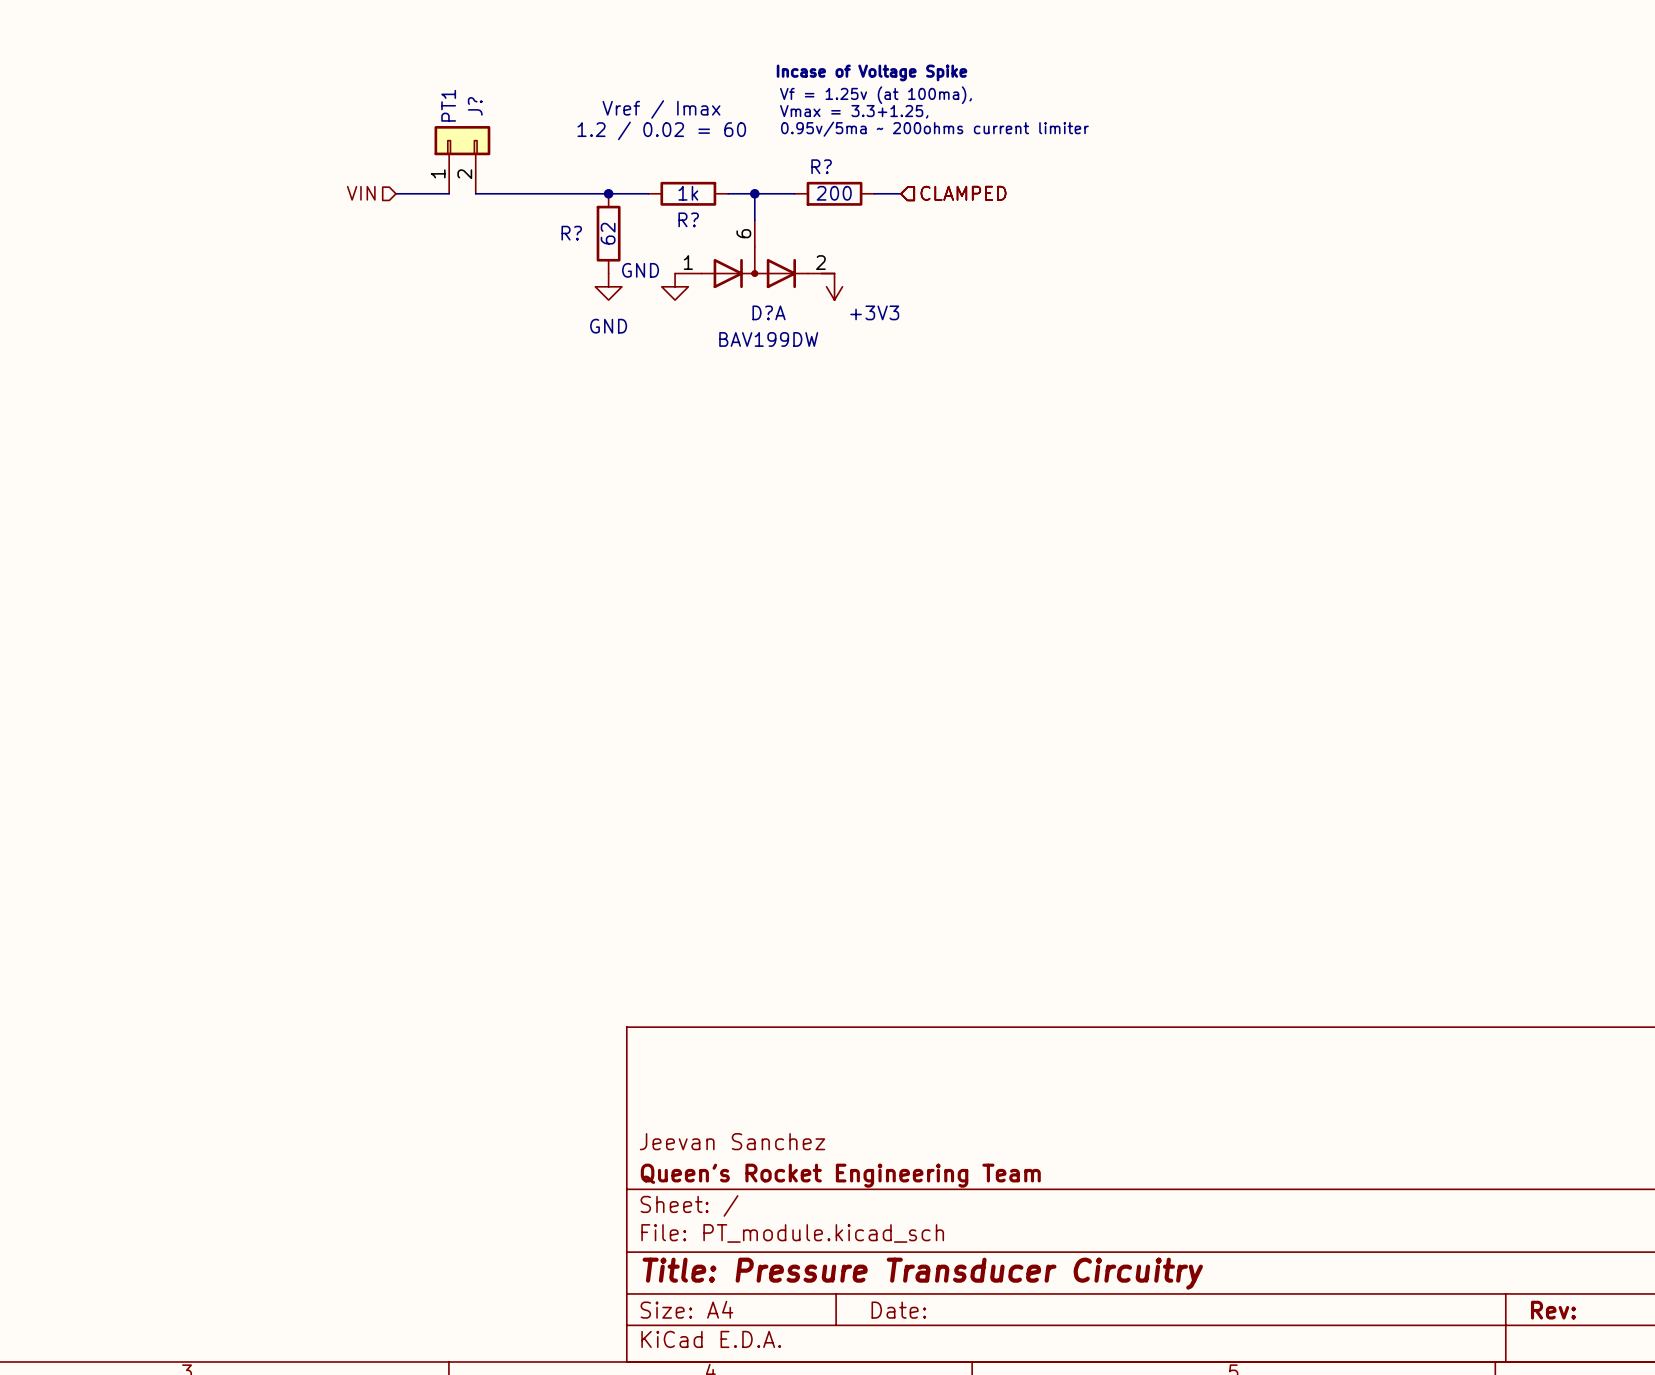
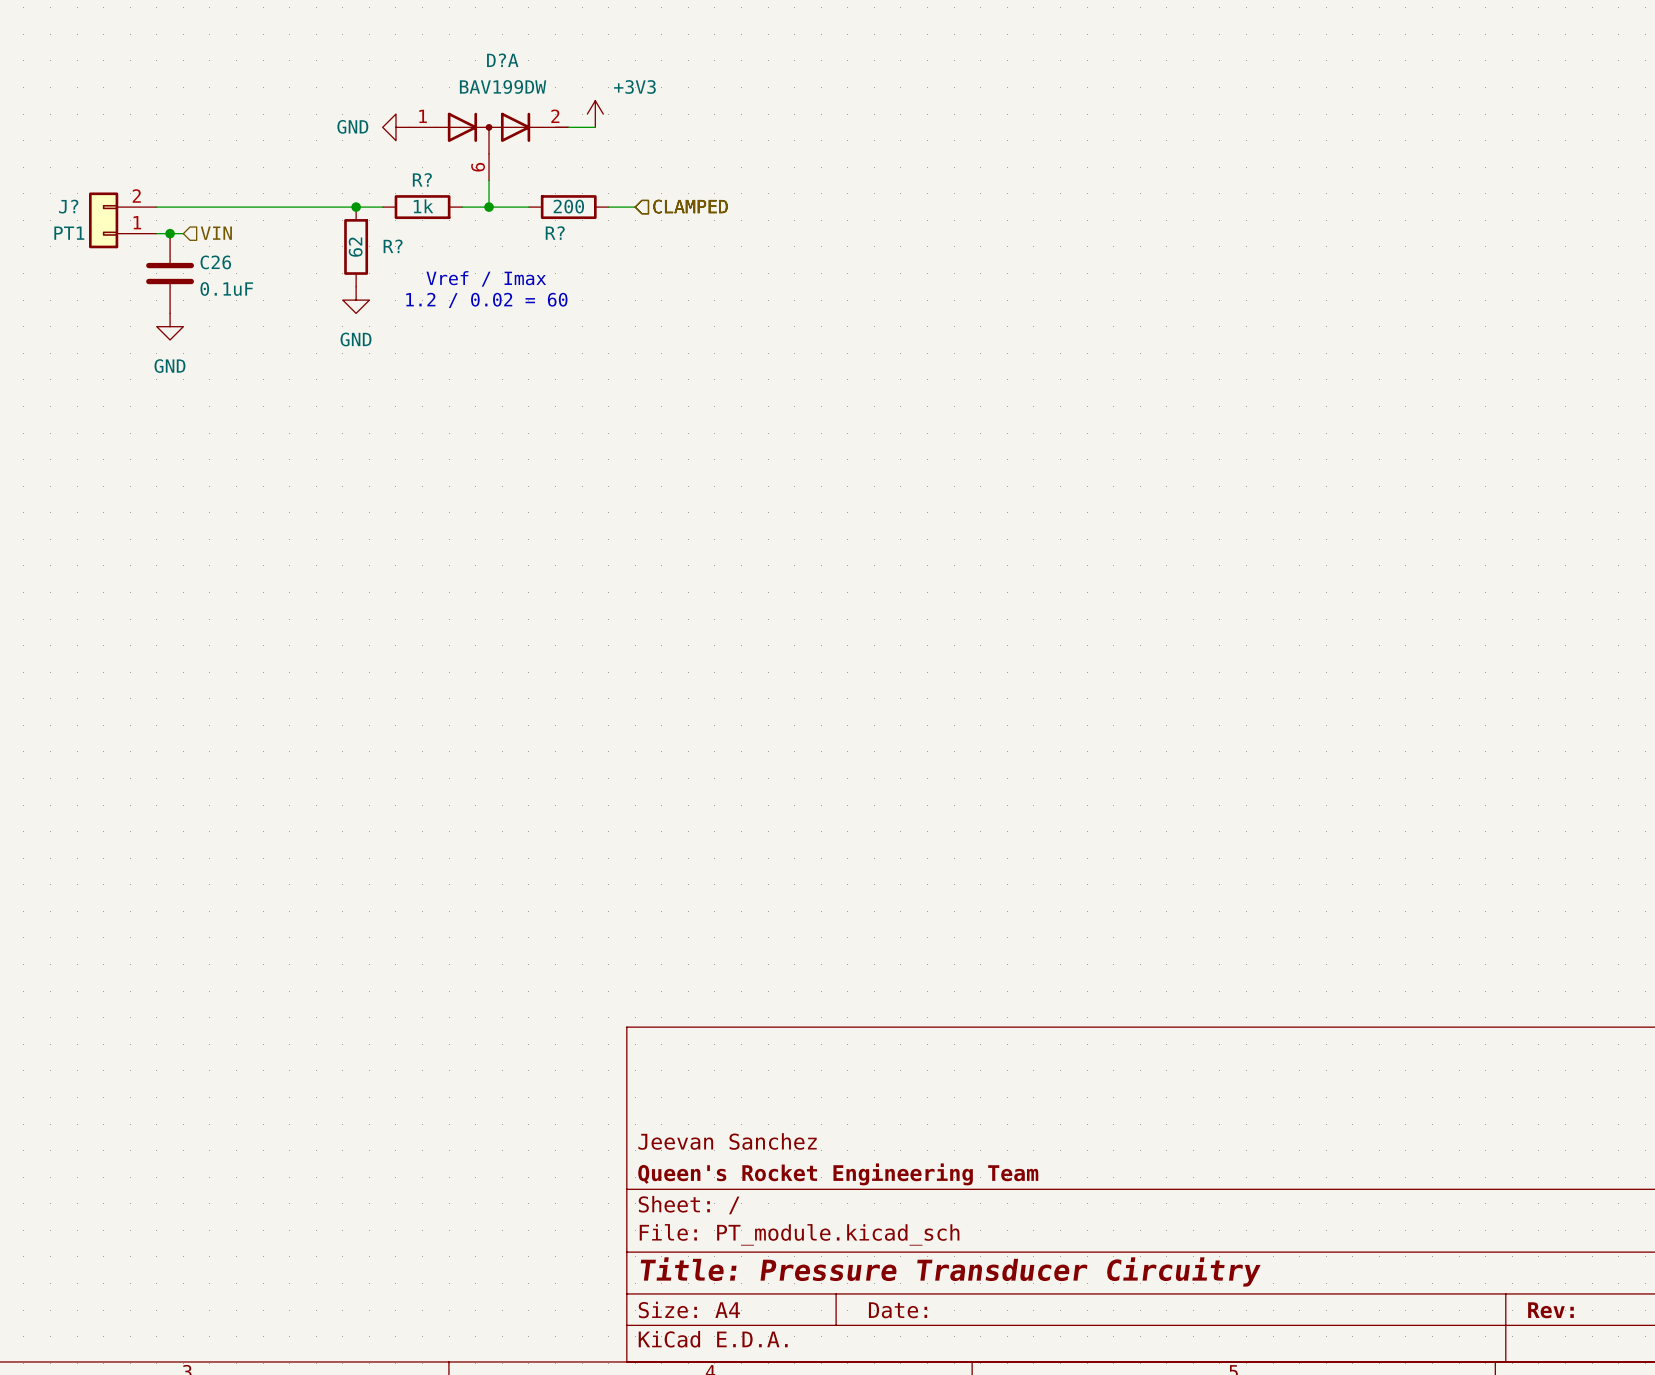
text: Incase of Voltage Spike (871, 72) -> none
text: Vf = 1.25v (at 100ma), (875, 95) -> none
text position: Vref / Imax (661, 109) -> Vref / Imax (486, 278)
text: Vmax = 3.3+1.25, (854, 111) -> none
power symbol: none -> +3V3 (595, 114)
power symbol: none -> GND (395, 127)
wire: none -> (568, 127) (595, 127)
text: 0.95v/5ma ~ 200ohms current limiter (934, 129) -> none
text position: 1.2 / 0.02 = 60 (661, 130) -> 1.2 / 0.02 = 60 (486, 300)
D?A: none -> BAV199DW (489, 146)
J?: PT1 (462, 159) -> none
wire: none -> (489, 180) (489, 207)
hierarchical label rotation: 0° (361, 193) -> 180° (216, 233)
hierarchical label position: VIN (361, 193) -> VIN (216, 233)
wire: (395, 193) (449, 193) -> none
wire: (475, 193) (648, 193) -> none
junction: (608, 193) -> none
R?: 1k (688, 193) -> none
wire: (728, 193) (794, 193) -> none
wire: (754, 193) (754, 220) -> none
junction: (754, 193) -> none
R?: 200 (834, 193) -> none
wire: (874, 193) (900, 193) -> none
hierarchical label: CLAMPED (963, 193) -> none
hierarchical label: none -> CLAMPED (690, 206)
wire: none -> (156, 207) (382, 207)
junction: none -> (356, 207)
R?: none -> 1k (422, 207)
wire: none -> (462, 207) (528, 207)
junction: none -> (489, 207)
R?: none -> 200 (568, 207)
wire: none -> (608, 207) (635, 207)
J?: none -> PT1 (122, 220)
wire: none -> (156, 233) (183, 233)
junction: none -> (170, 233)
R? name position: R? (571, 233) -> R? (393, 246)
R? position: (608, 233) -> (356, 246)
D?A: BAV199DW (754, 254) -> none
C26: none -> 0.1uF (170, 273)
power symbol: GND (608, 286) -> none
power symbol: GND (675, 286) -> none
power symbol: +3V3 (834, 286) -> none
power symbol: none -> GND (356, 300)
power symbol: none -> GND (170, 326)

